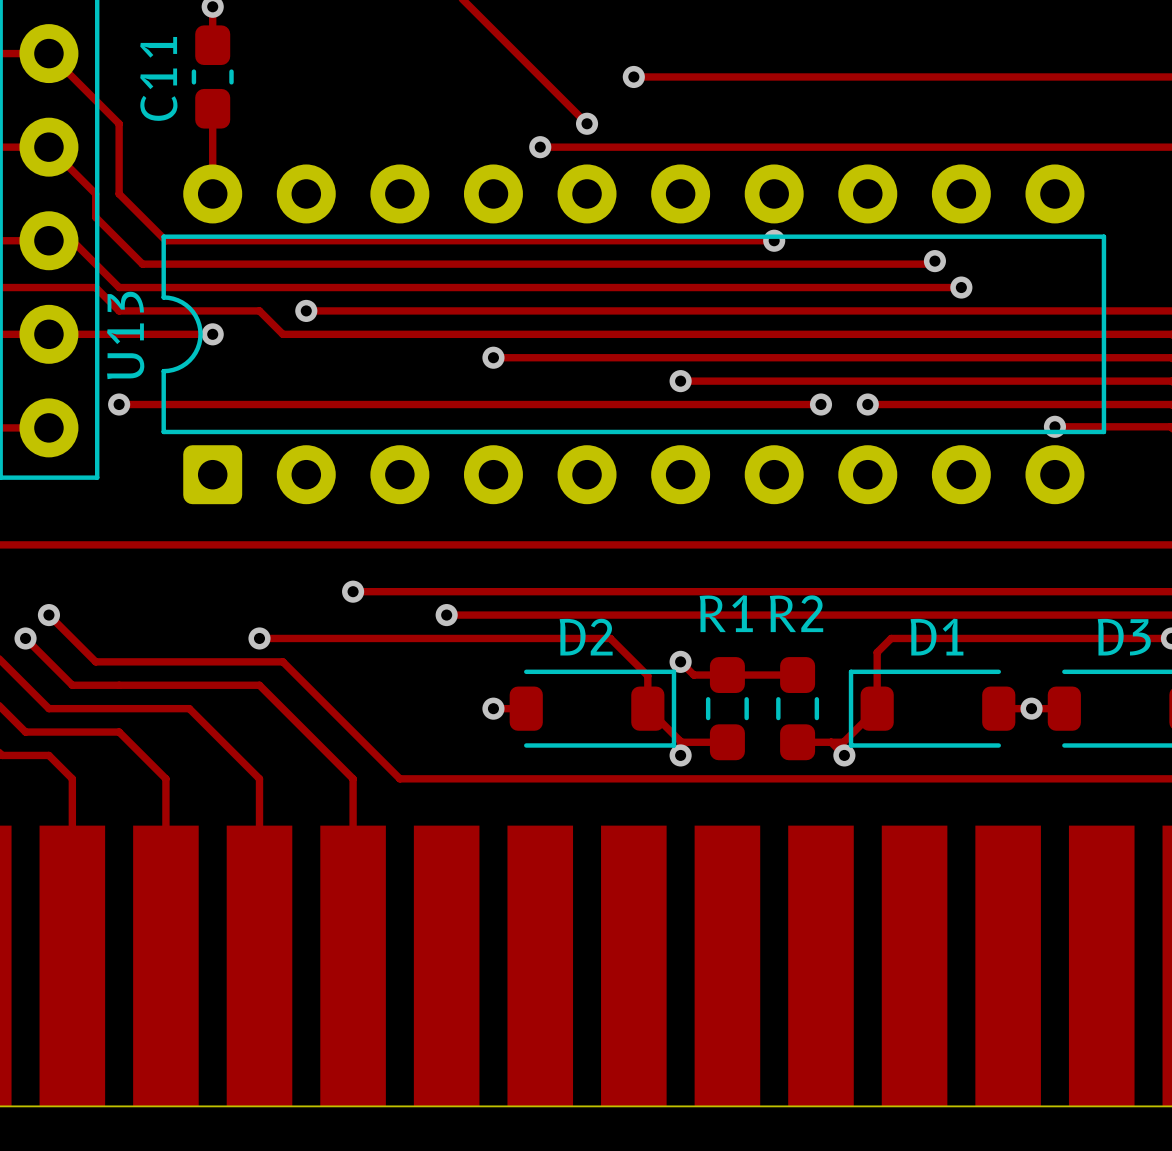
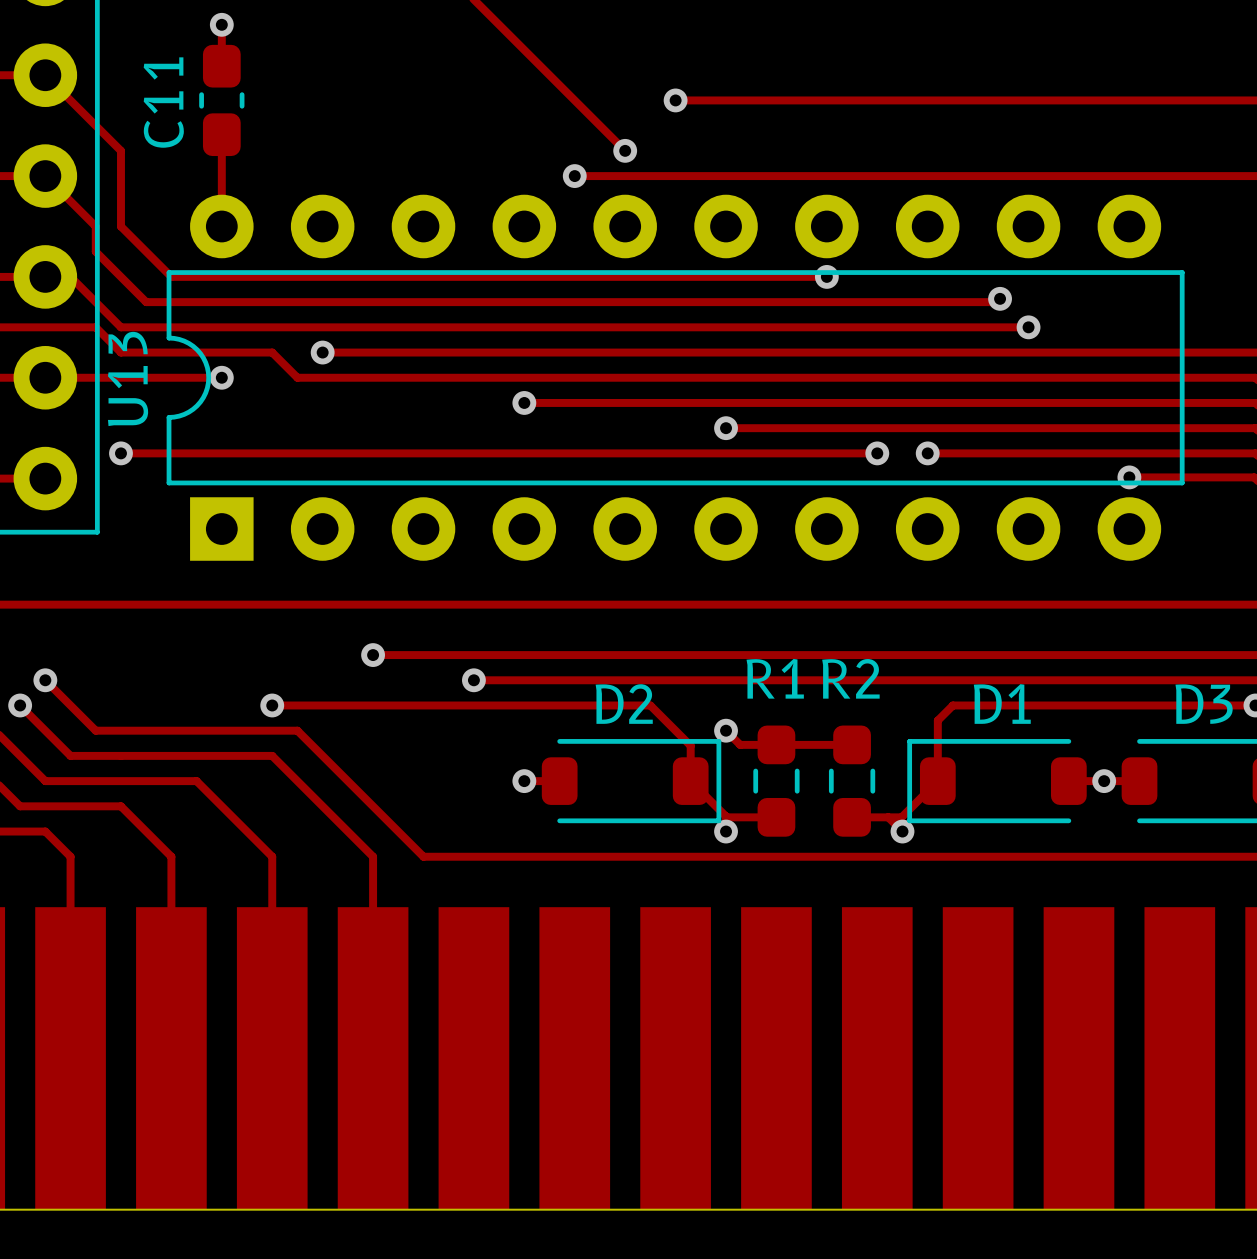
U13 footprint: [161, 164, 1107, 505] -> [166, 194, 1185, 561]

